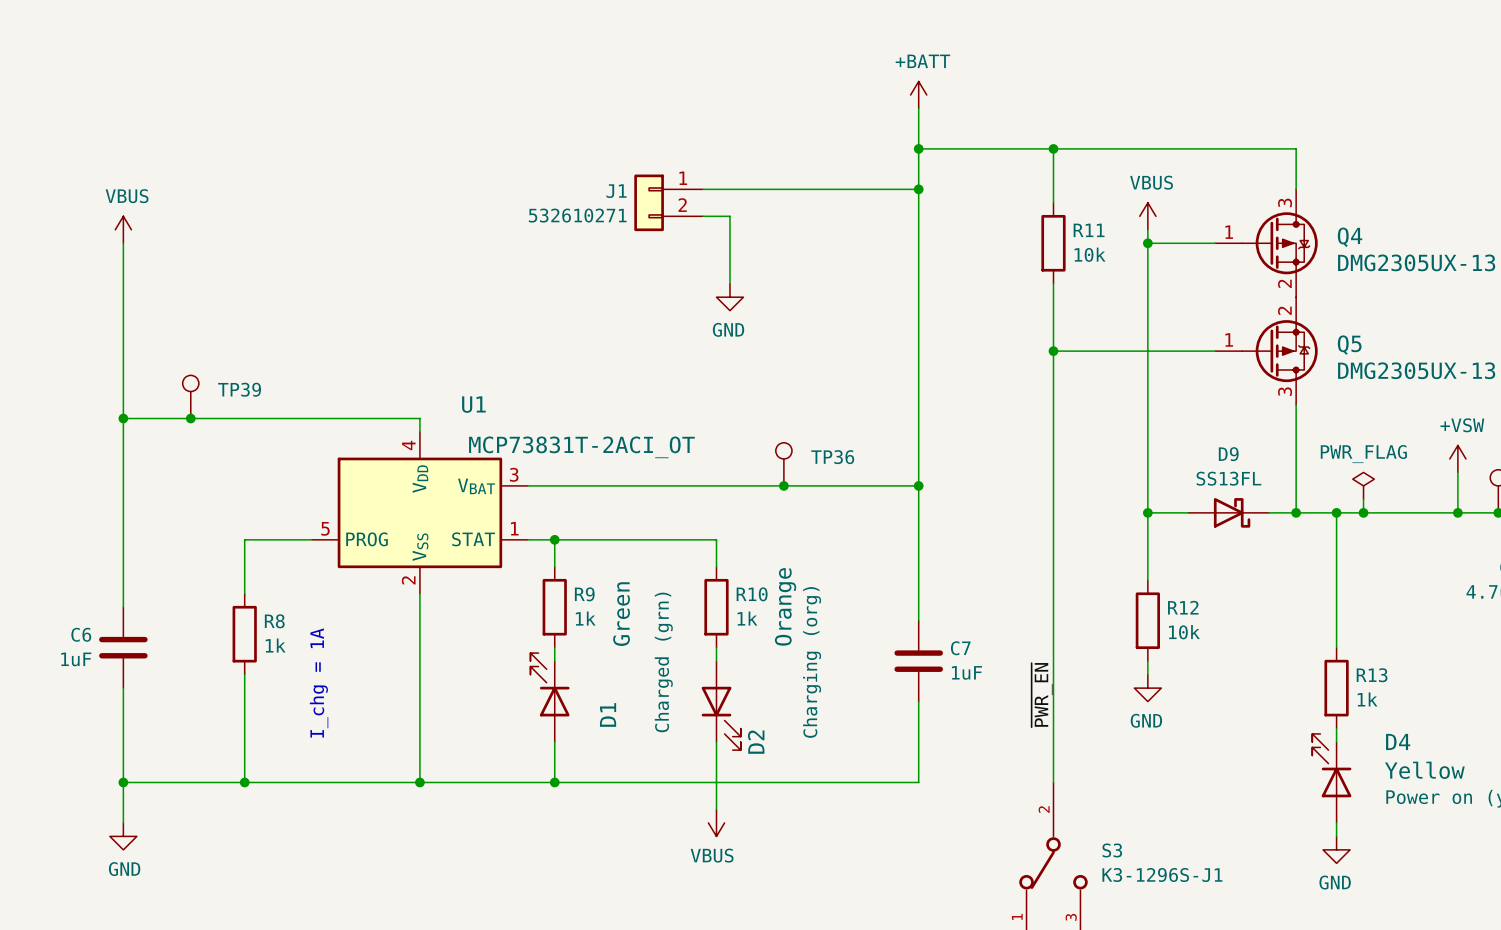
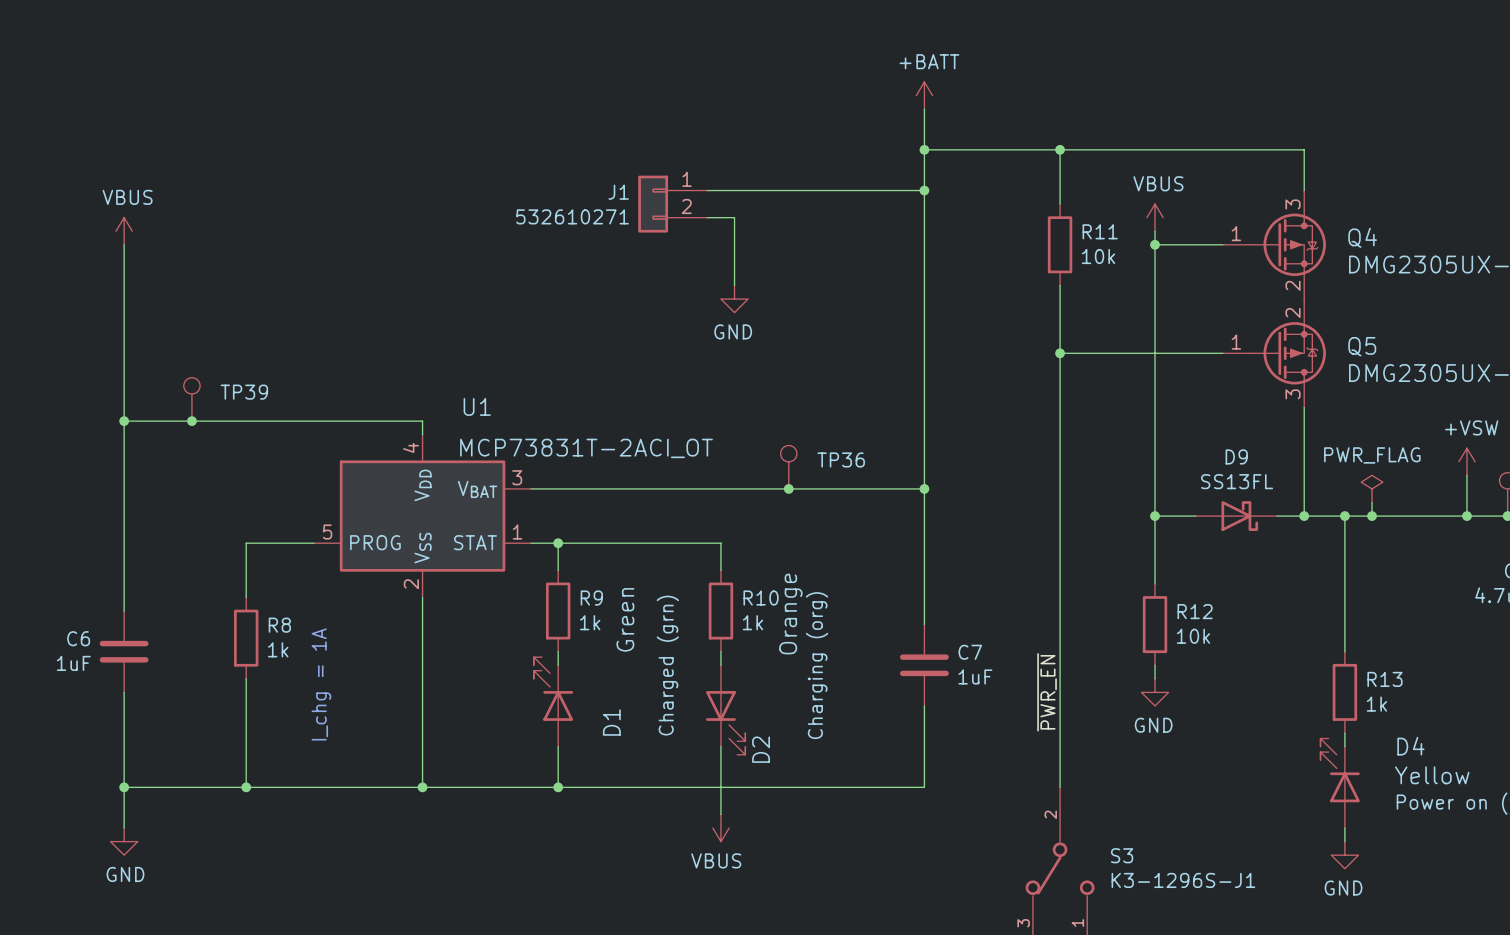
S3 pin number: 1 (1017, 916) -> 3 (1023, 923)
S3 pin number: 3 (1071, 917) -> 1 (1077, 922)

